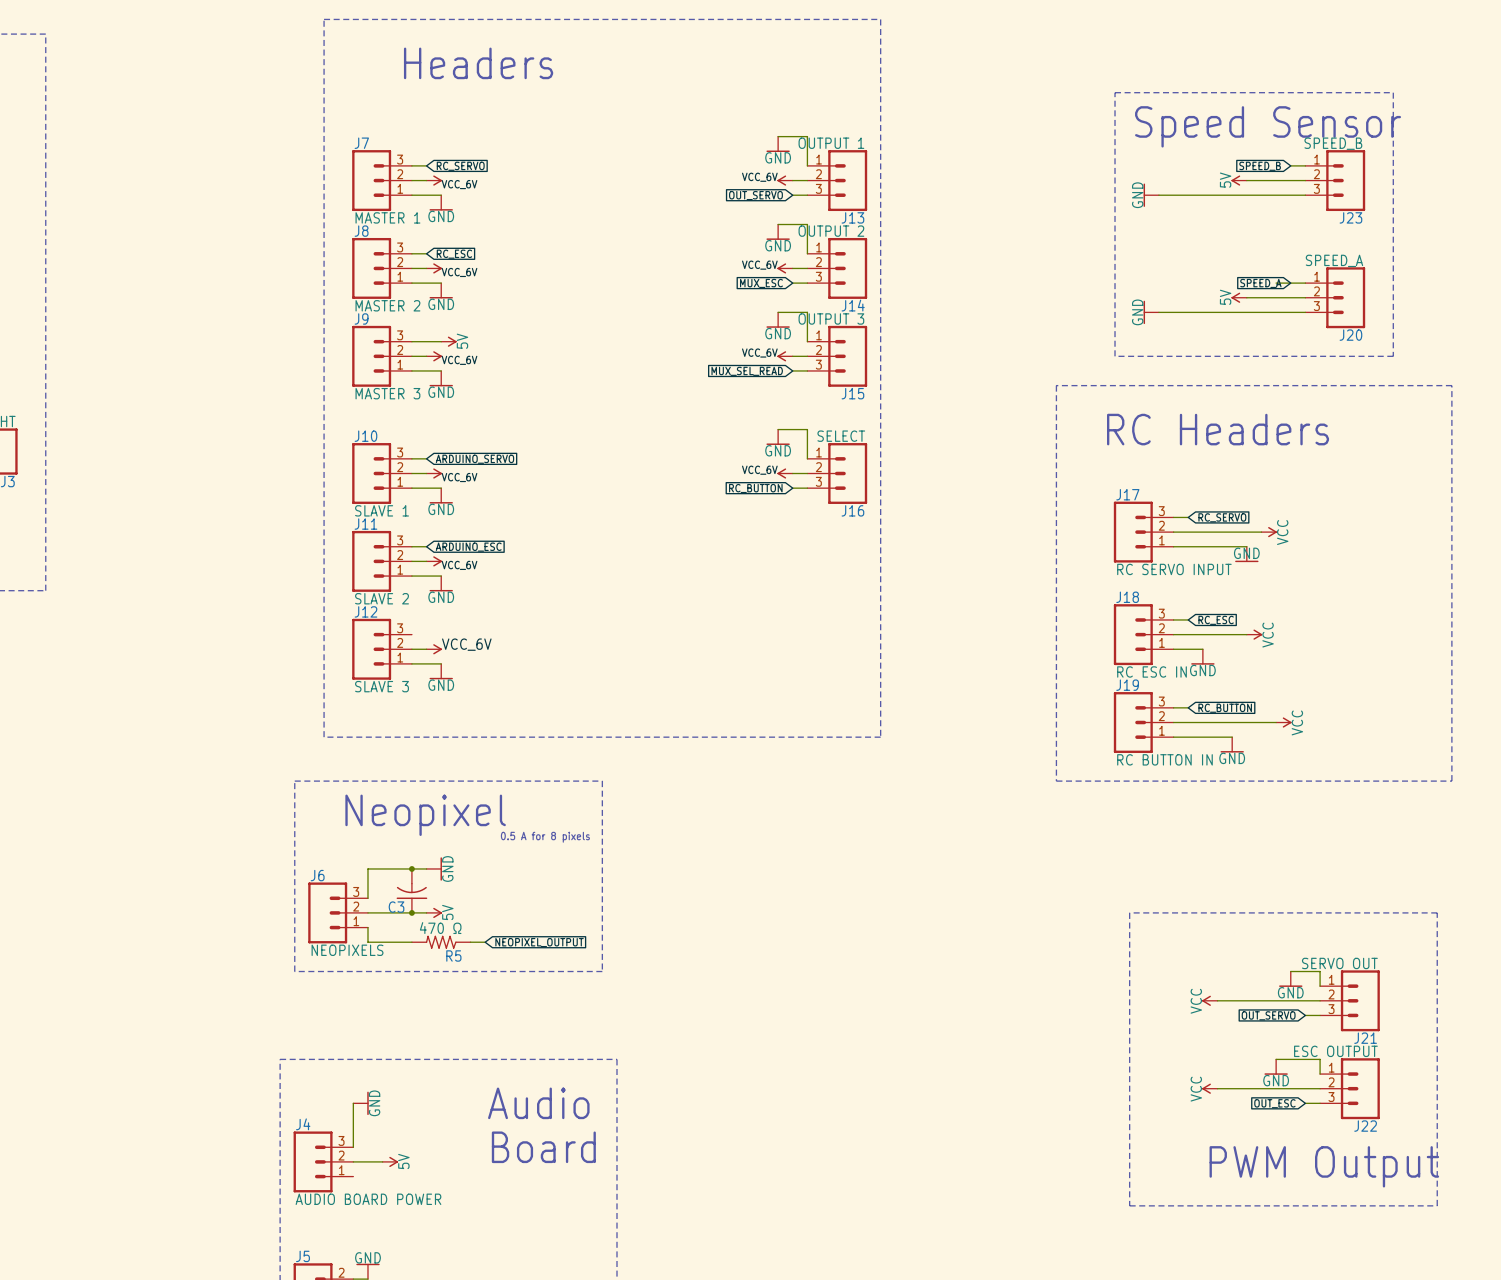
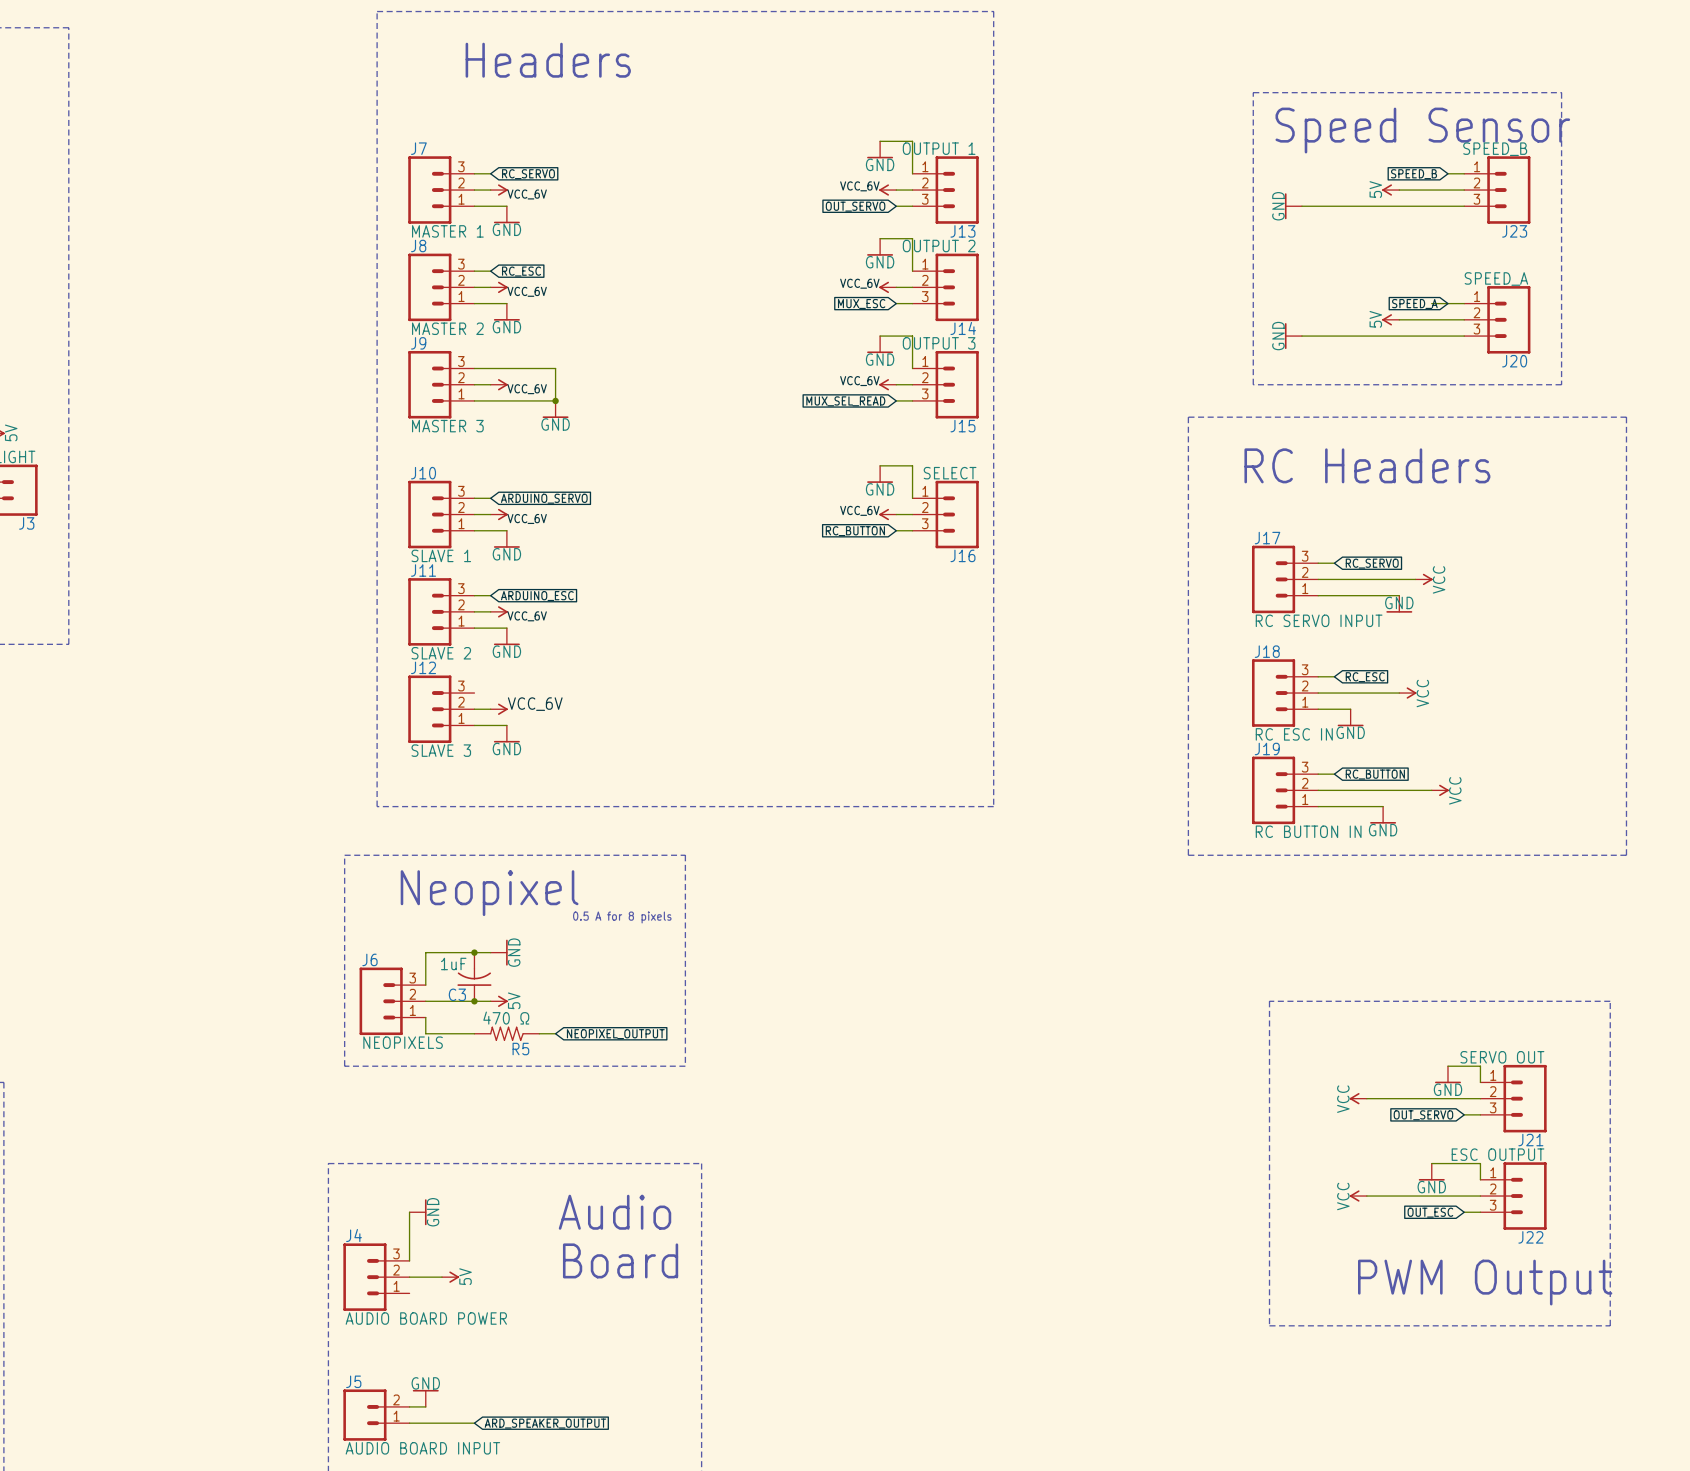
wire: none -> (506, 368) (555, 368) (555, 400) (506, 400)
power symbol: 5V (448, 341) -> none
junction: none -> (555, 400)
power symbol position: GND (441, 378) -> GND (555, 409)
C3 value: none -> 1uF (453, 963)

